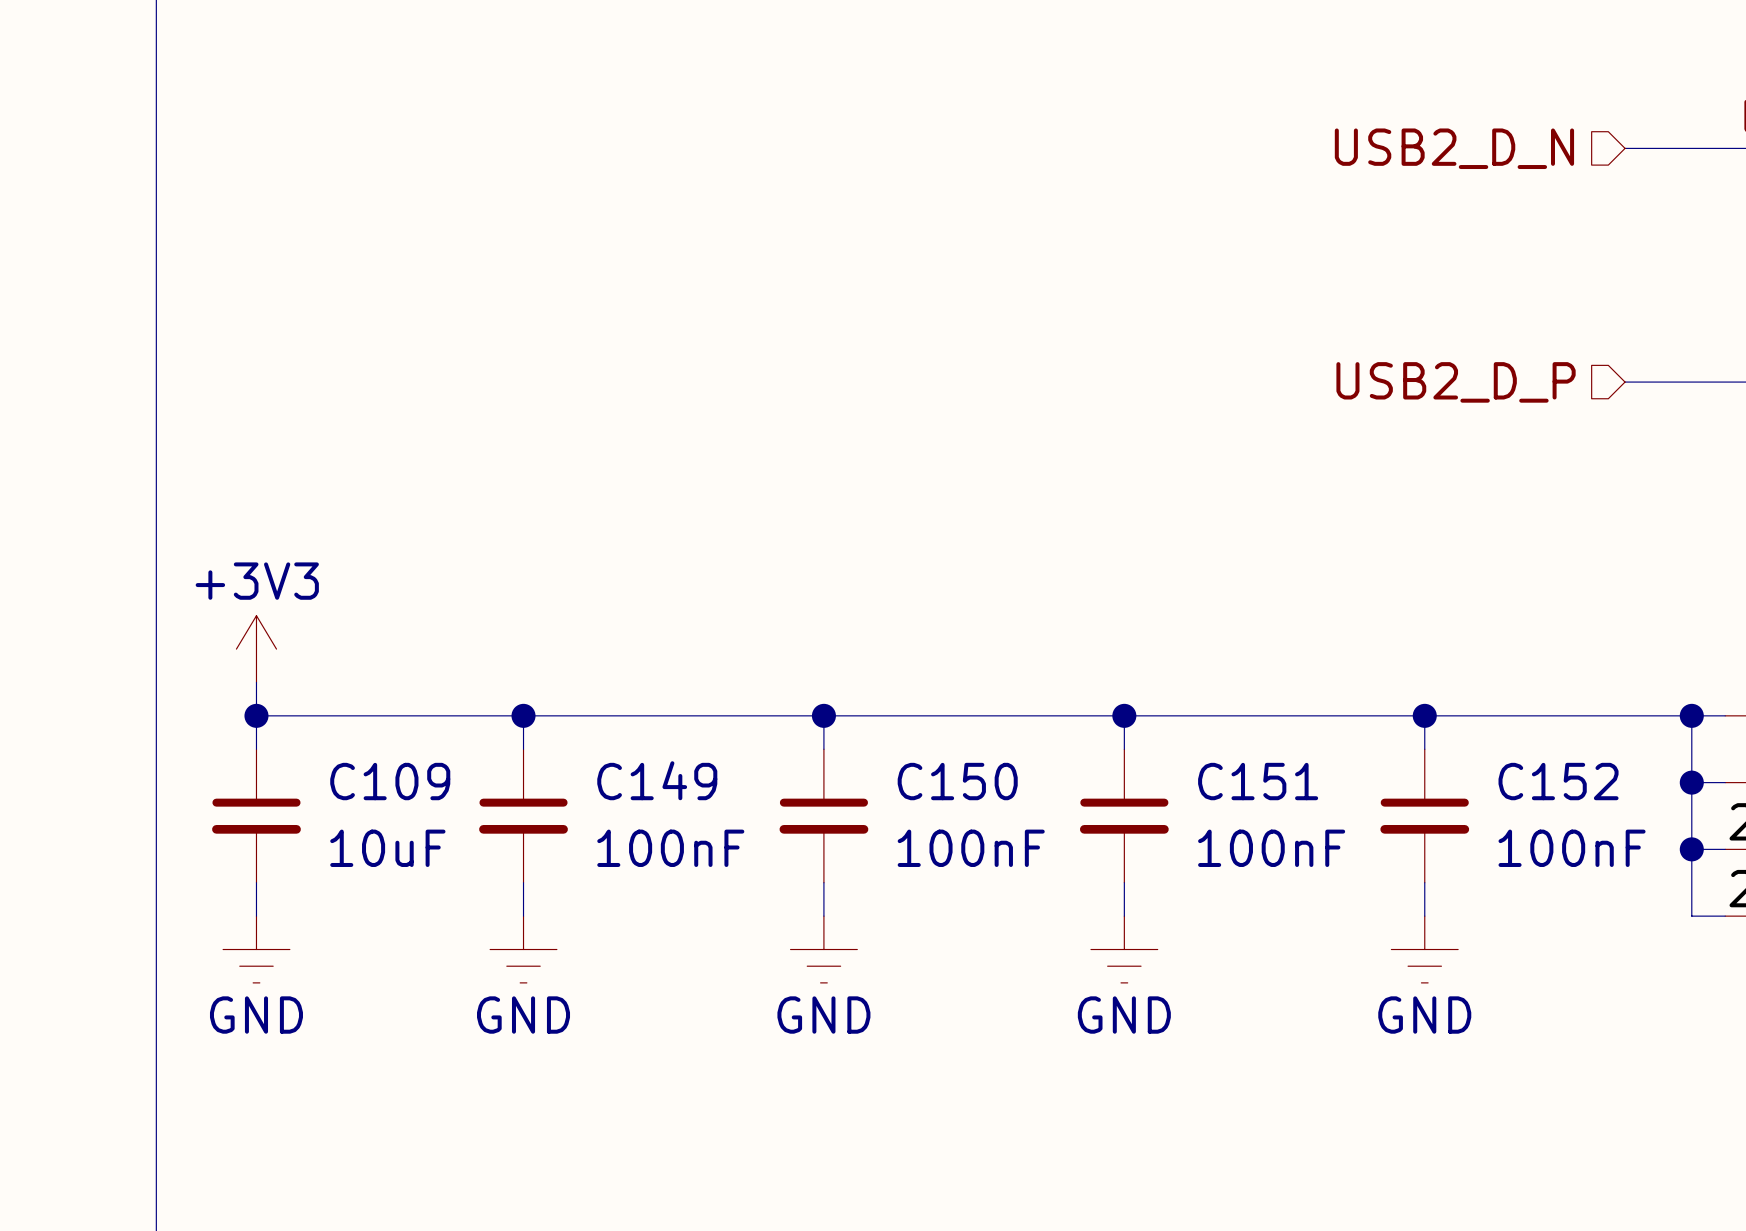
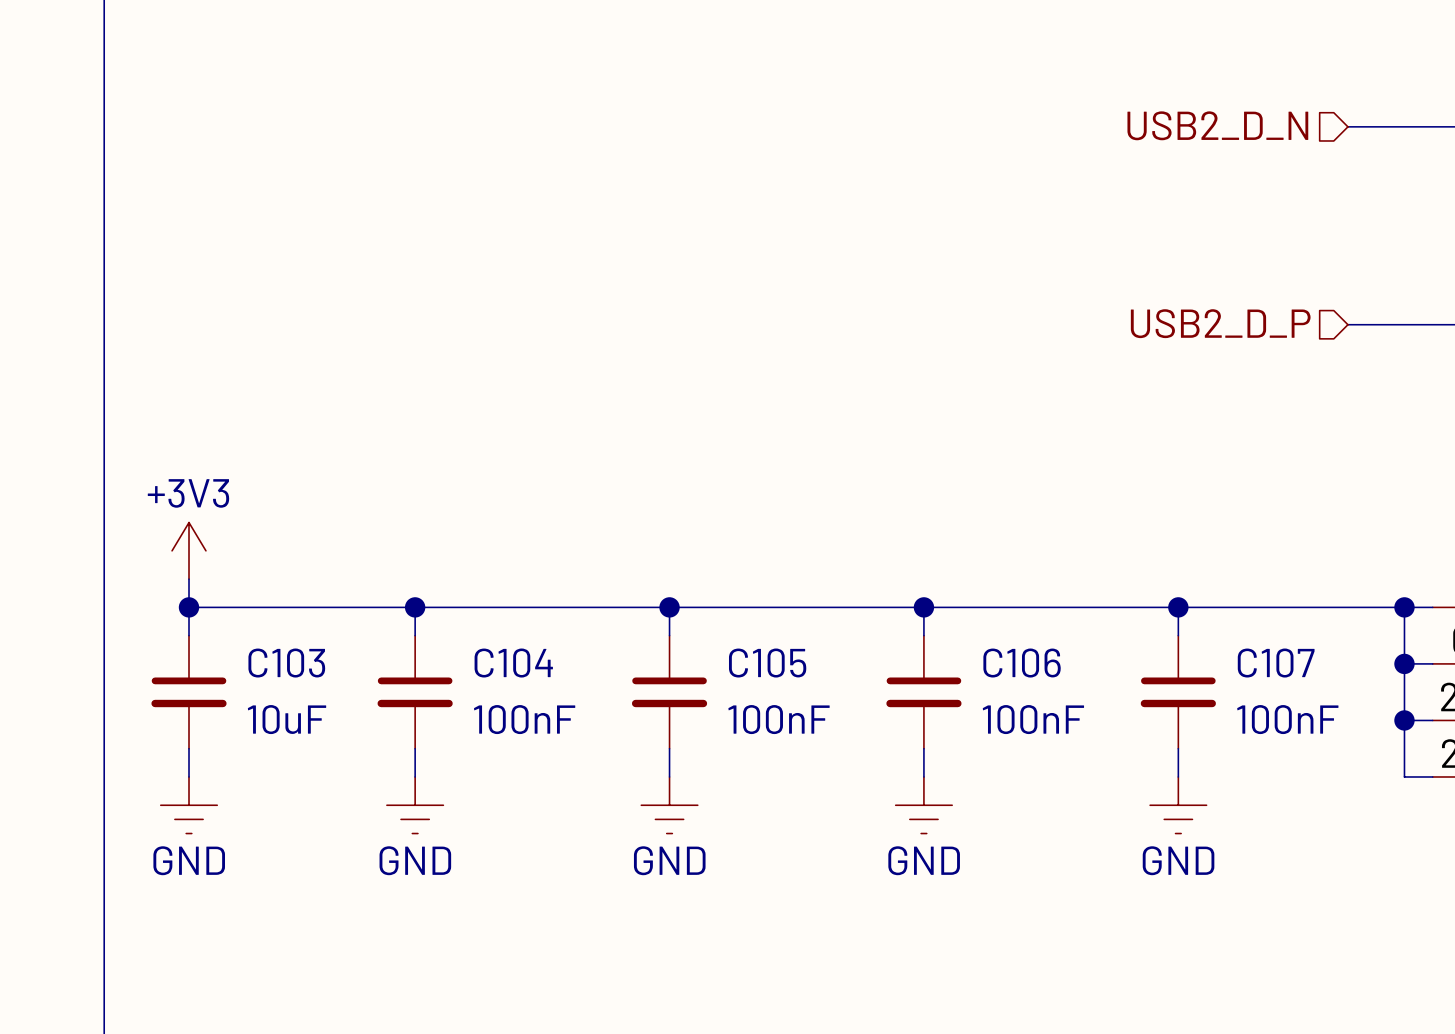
C149 name: C149 (657, 780) -> C104 (513, 663)
C109 name: C109 (390, 781) -> C103 (286, 663)
C150 name: C150 (957, 781) -> C105 (767, 663)
C151 name: C151 (1258, 781) -> C106 (1022, 663)
C152 name: C152 (1558, 781) -> C107 (1276, 663)

